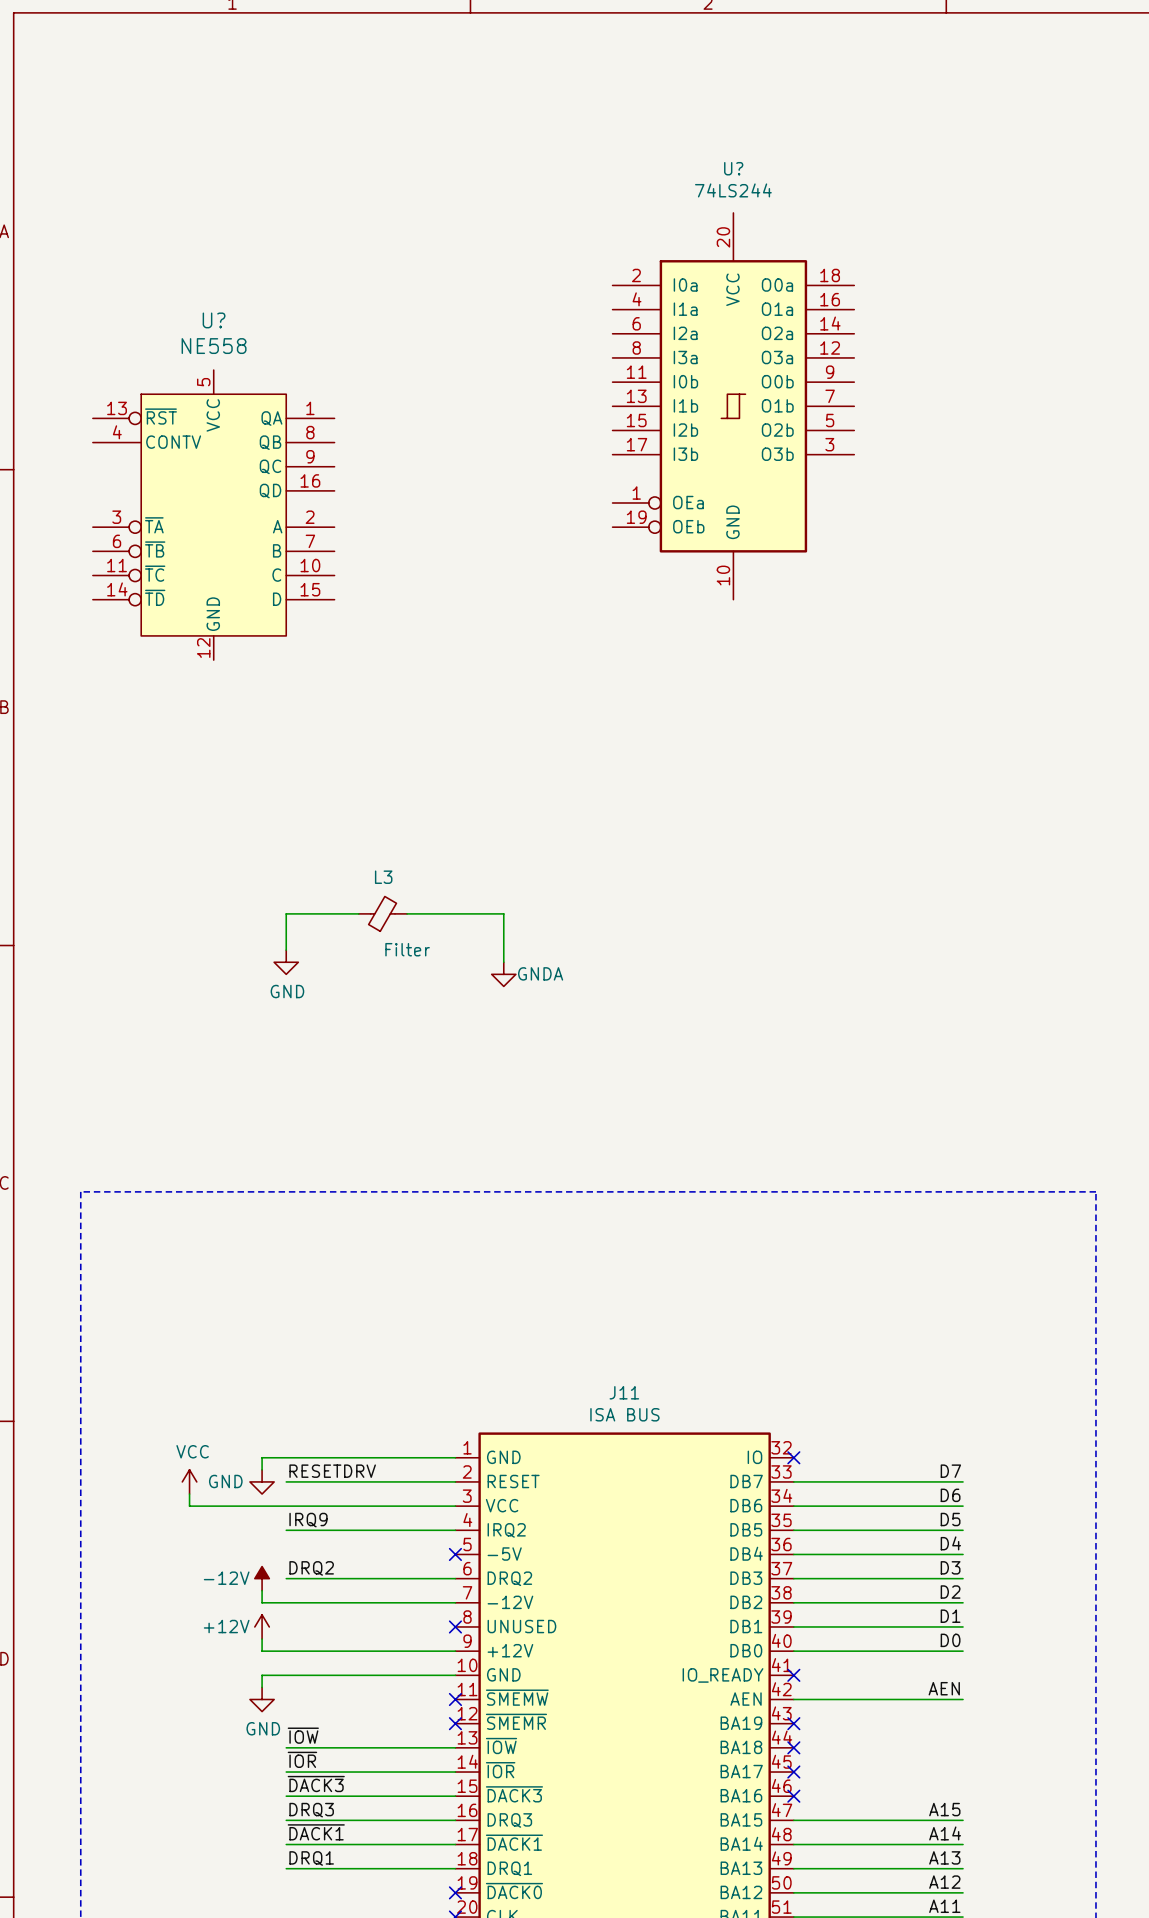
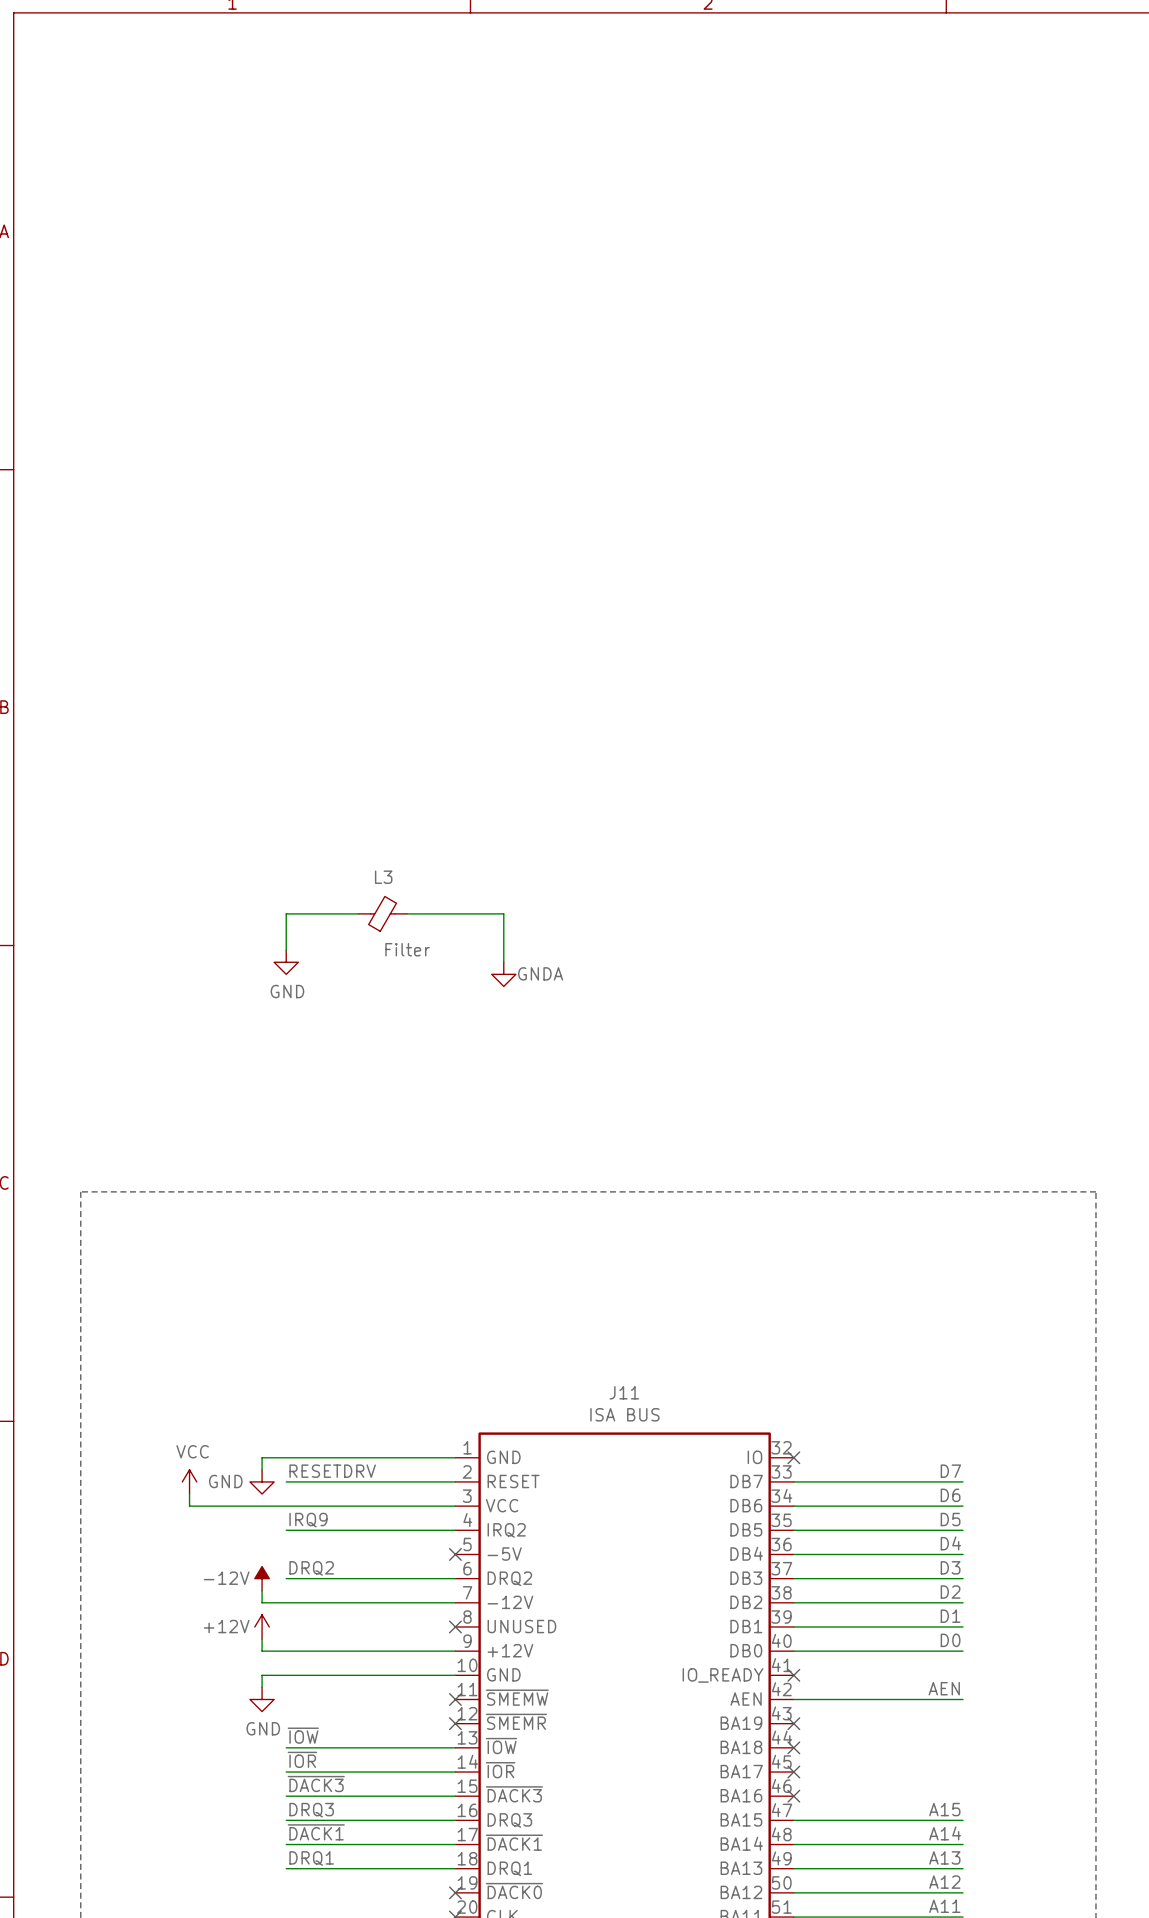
U?: 74LS244 (733, 406) -> none
U?: NE558 (213, 515) -> none

